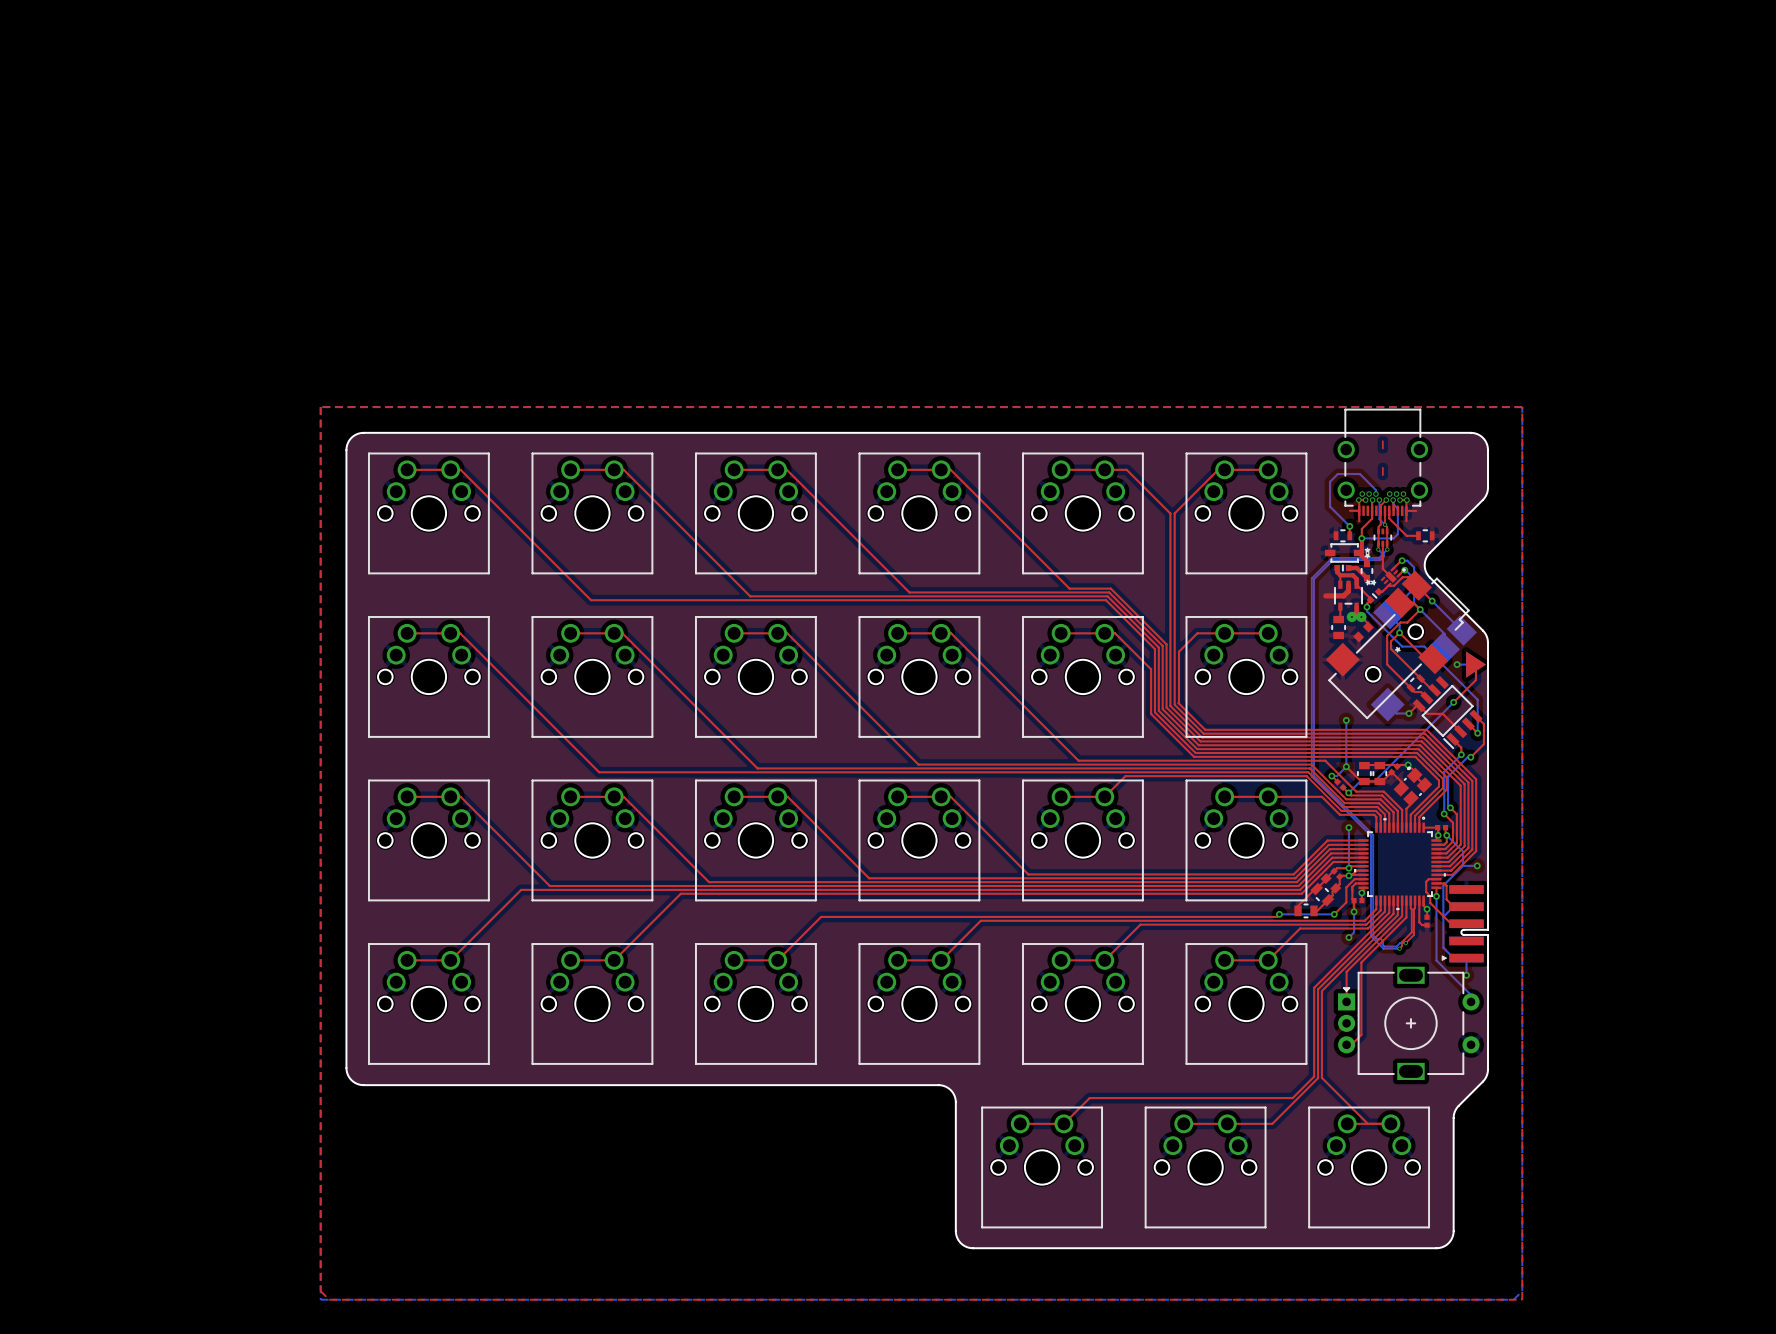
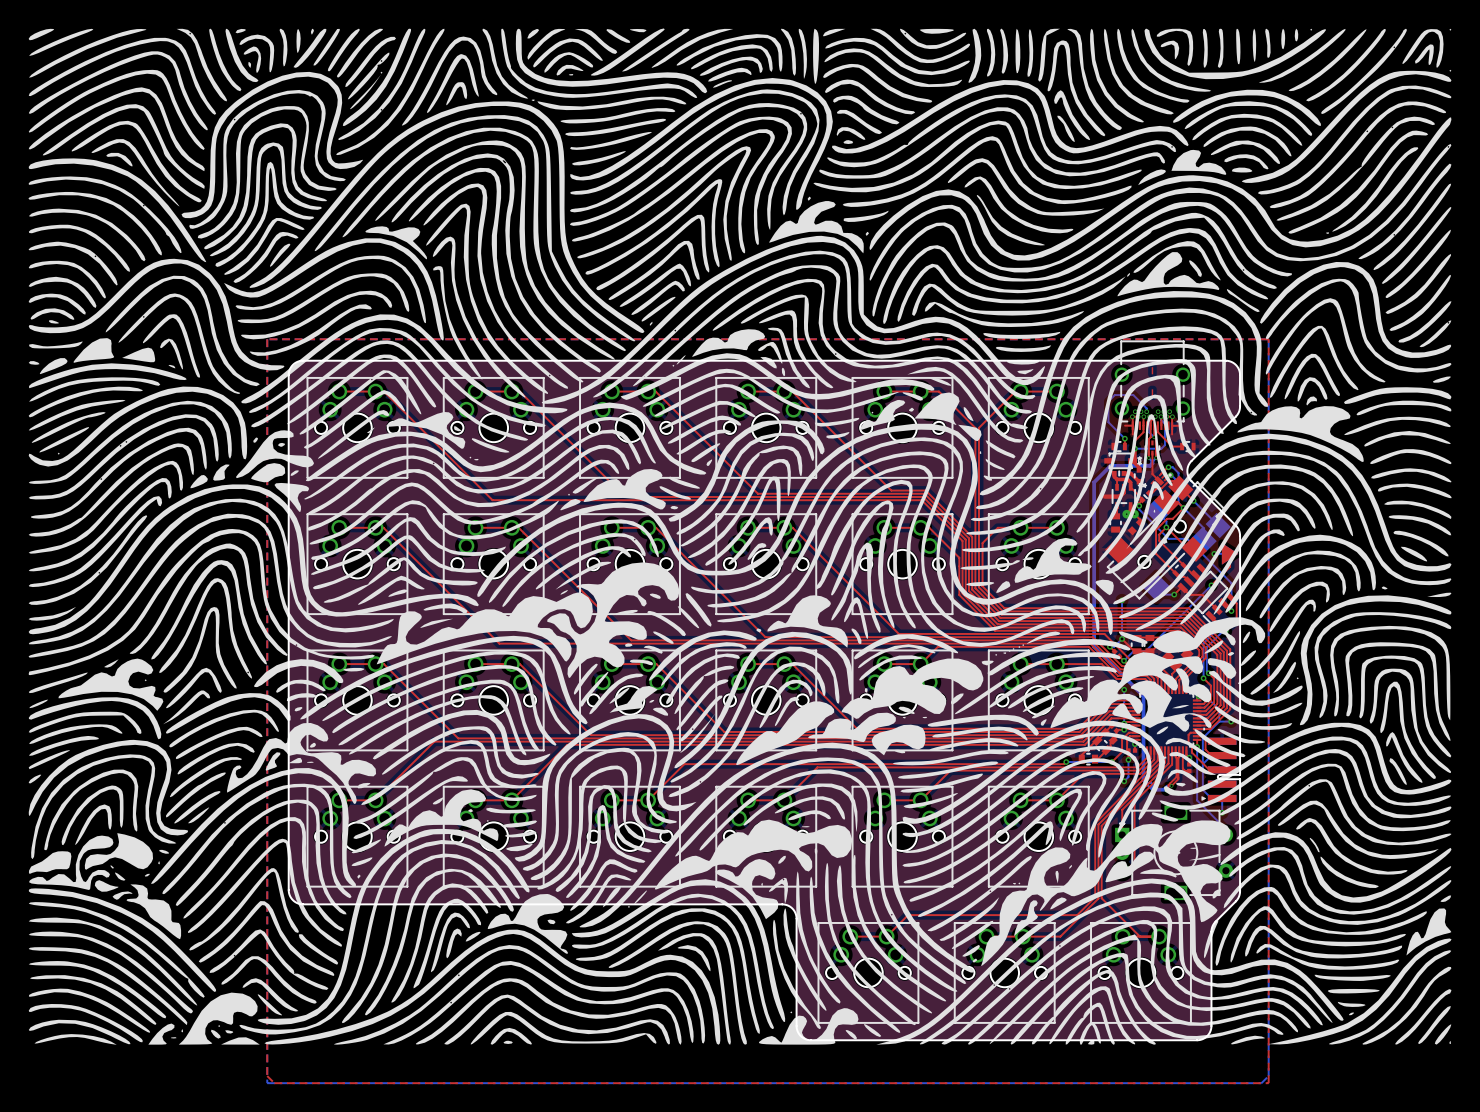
drawing: none -> [28, 28, 1452, 1045]

